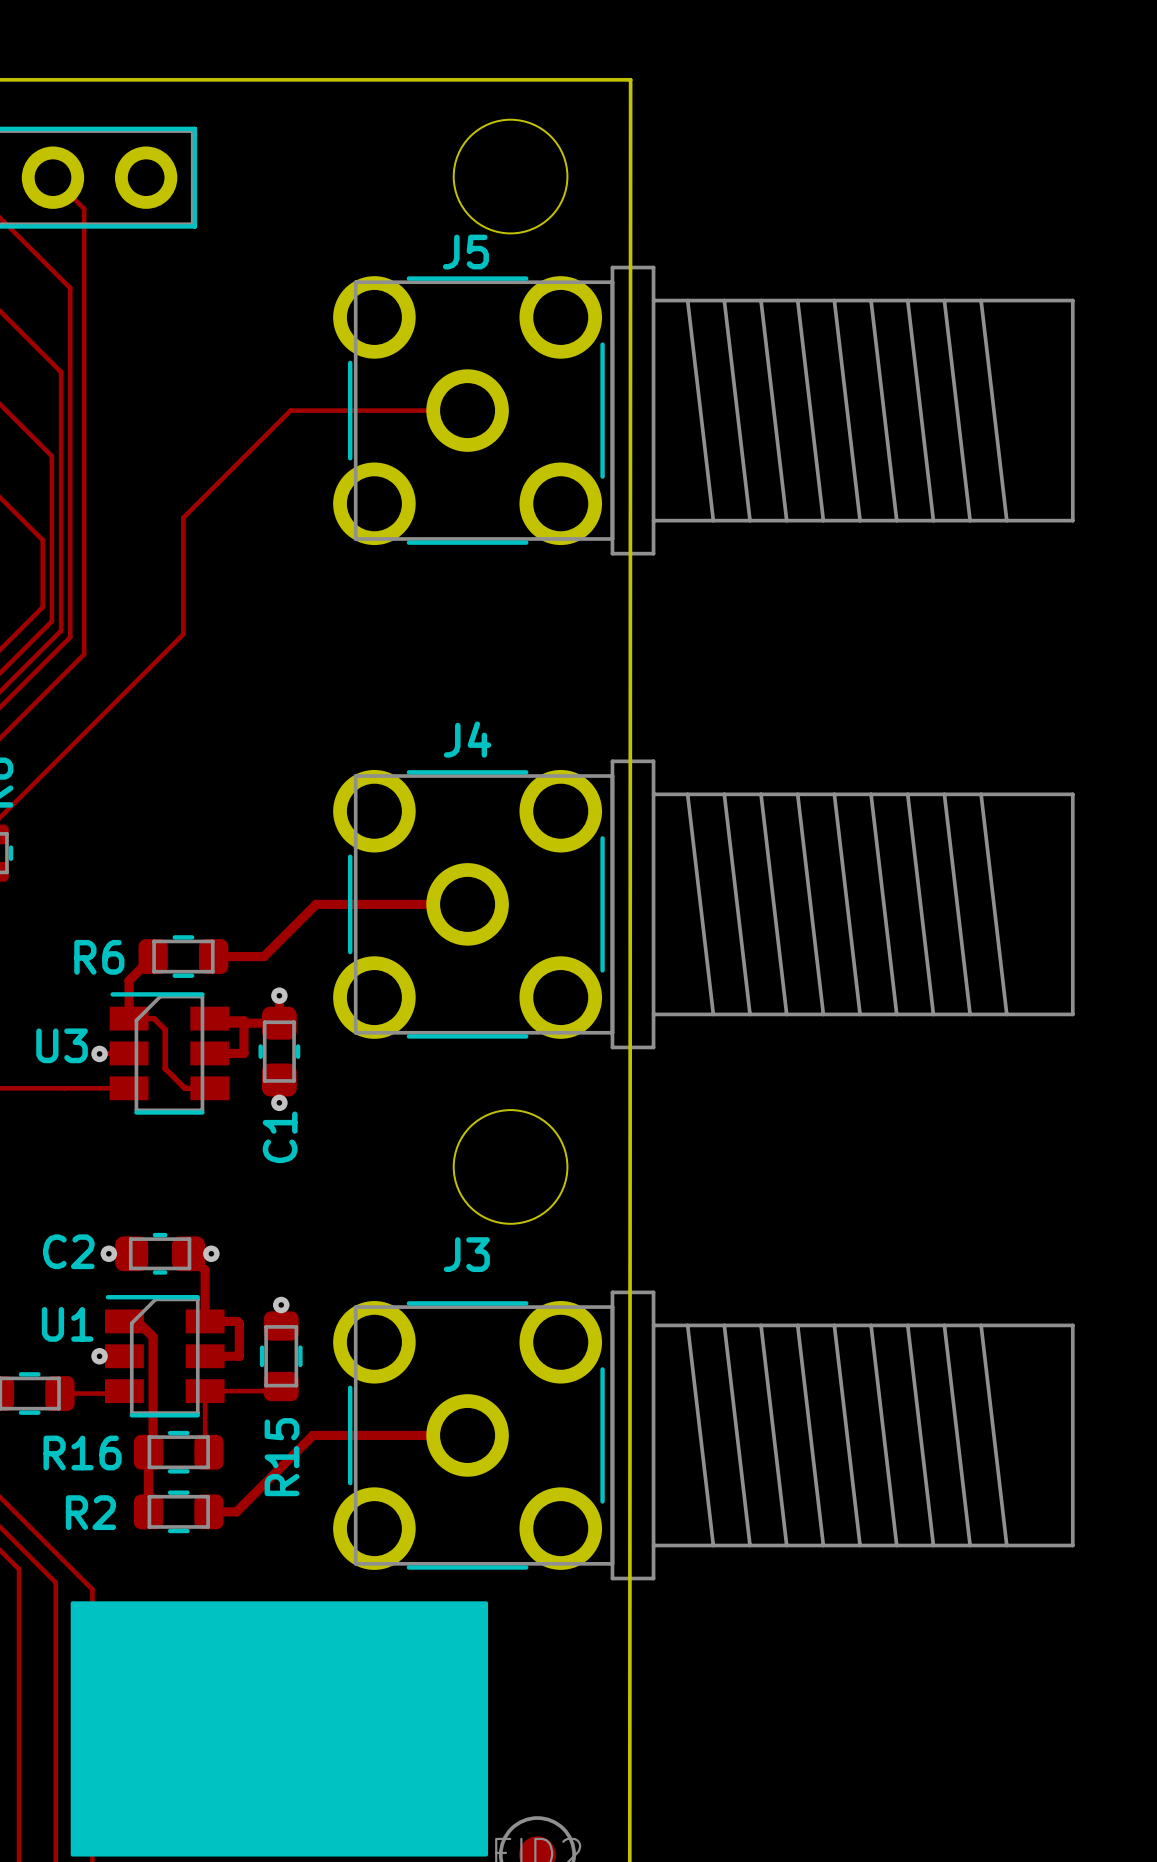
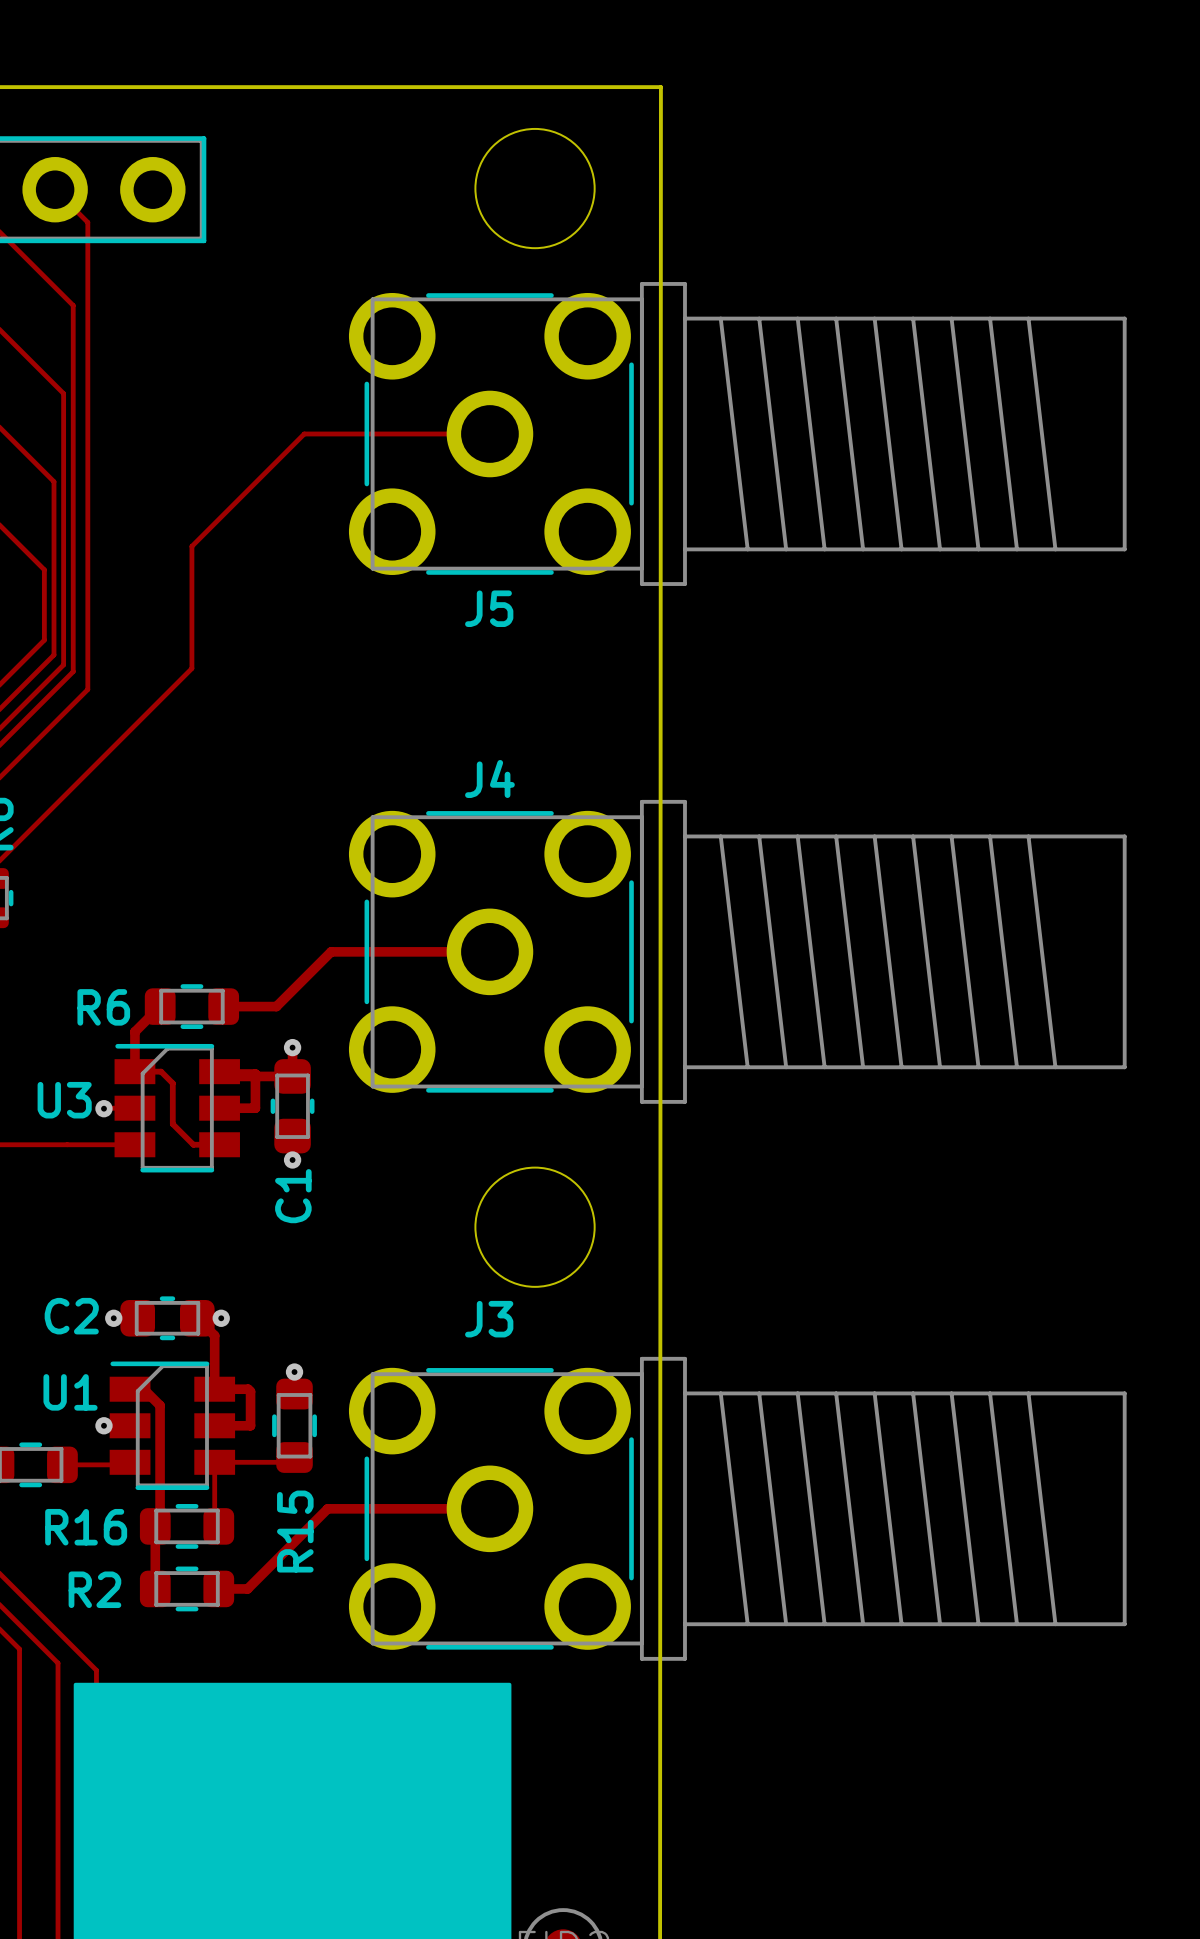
J5 name position: J5 (465, 252) -> J5 (489, 608)

